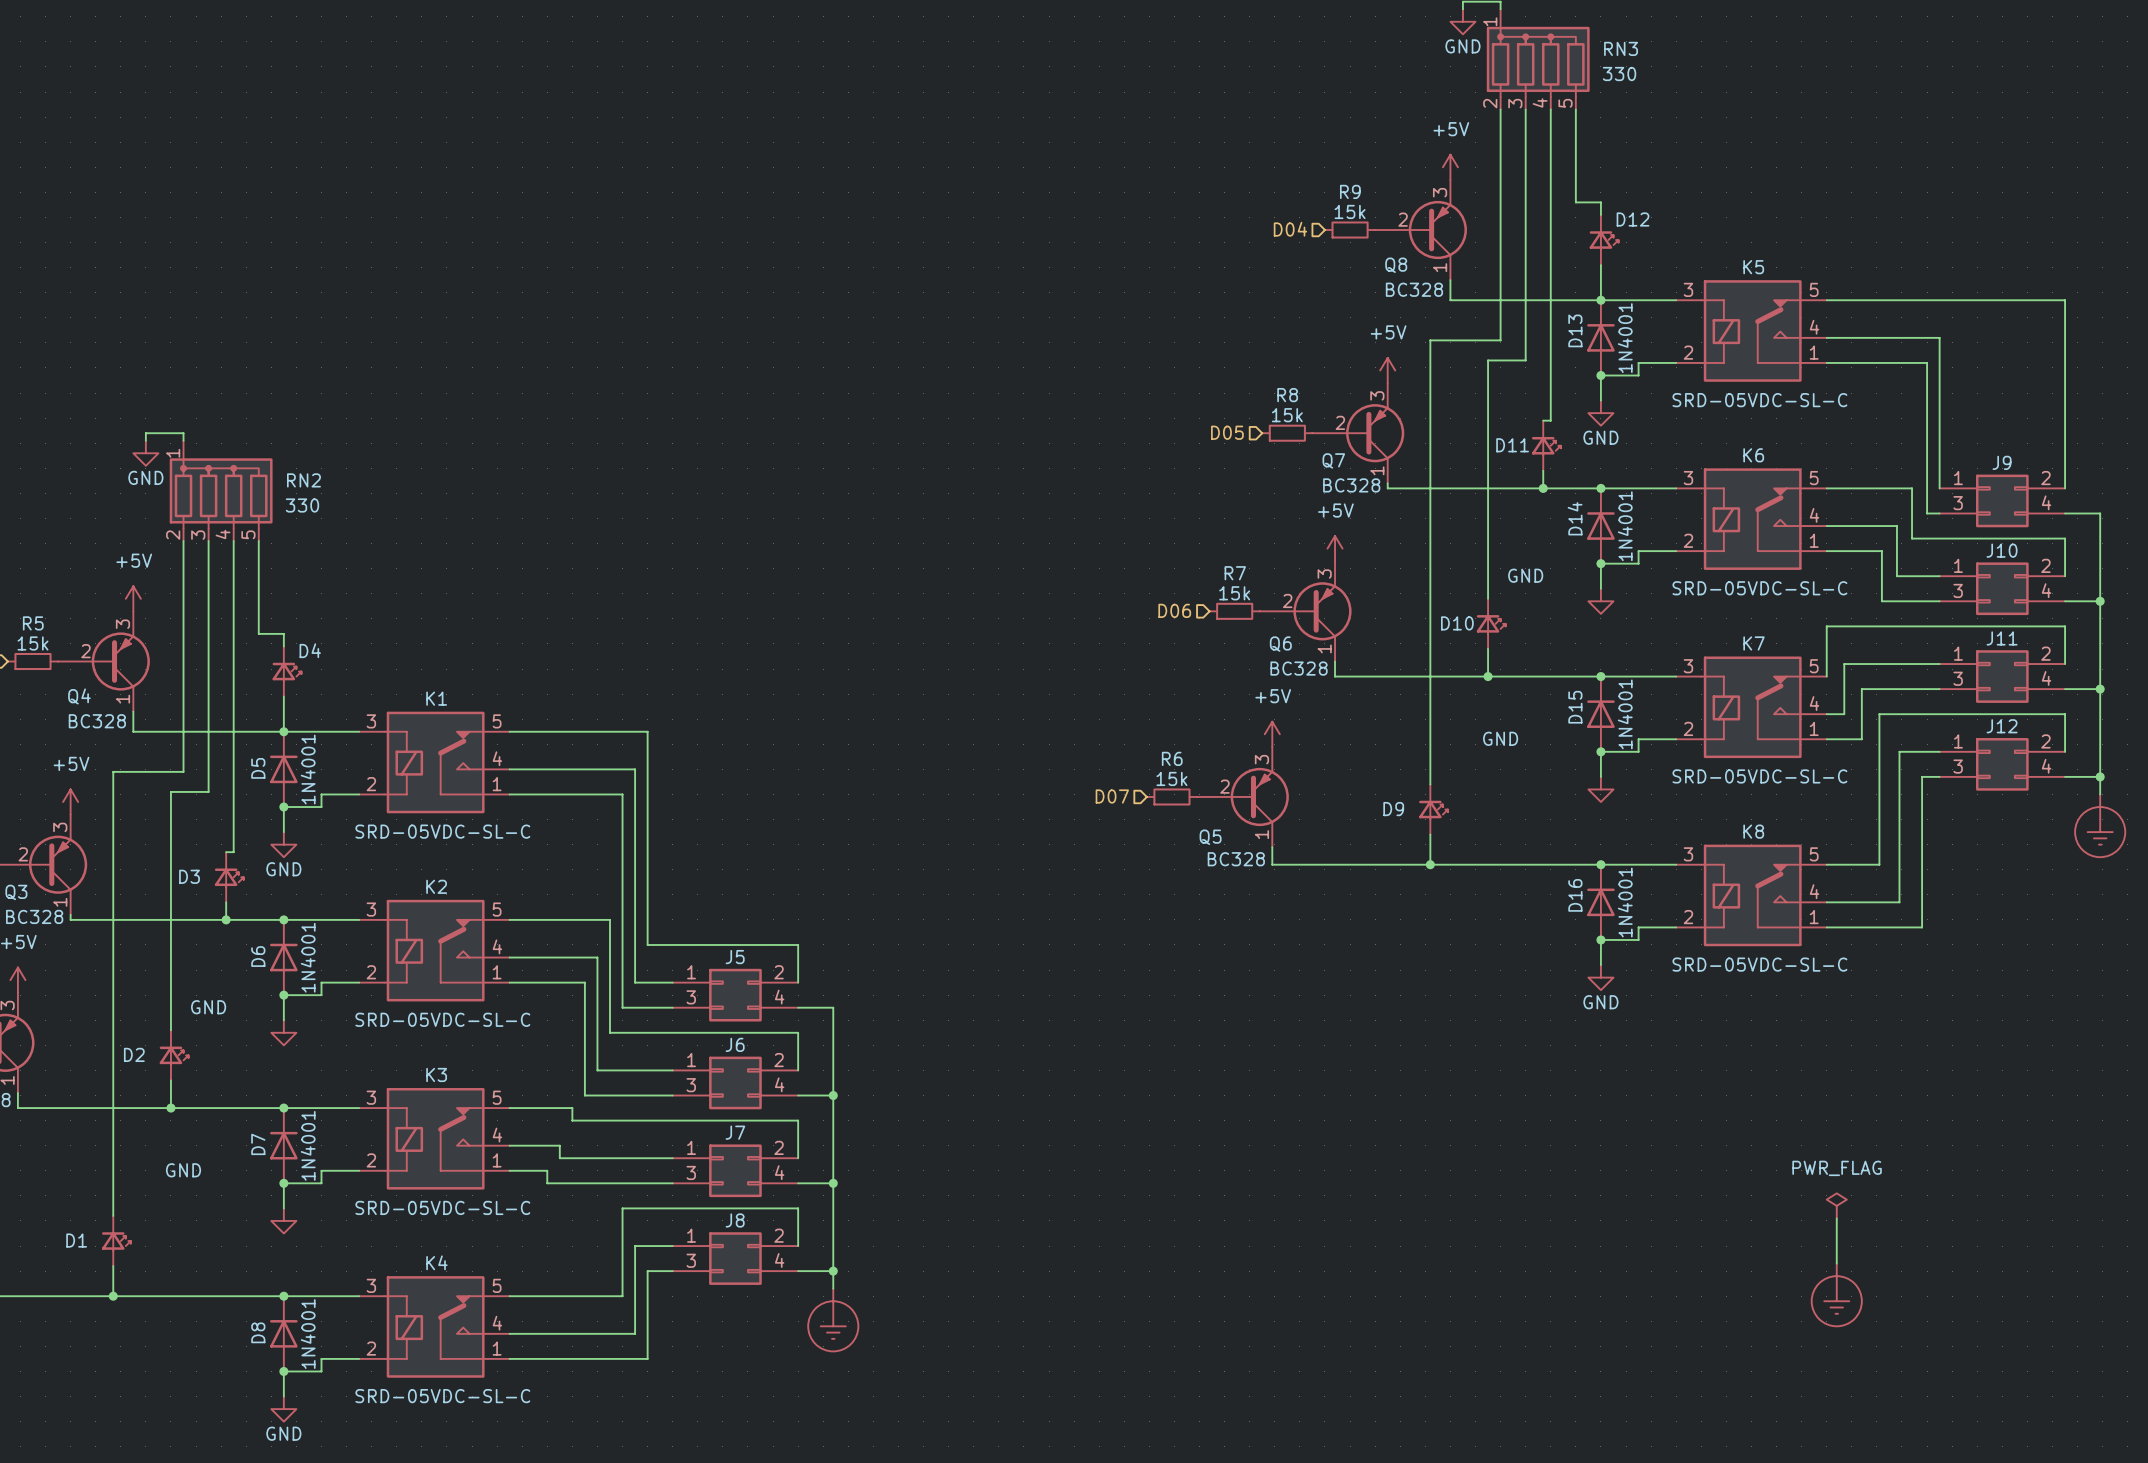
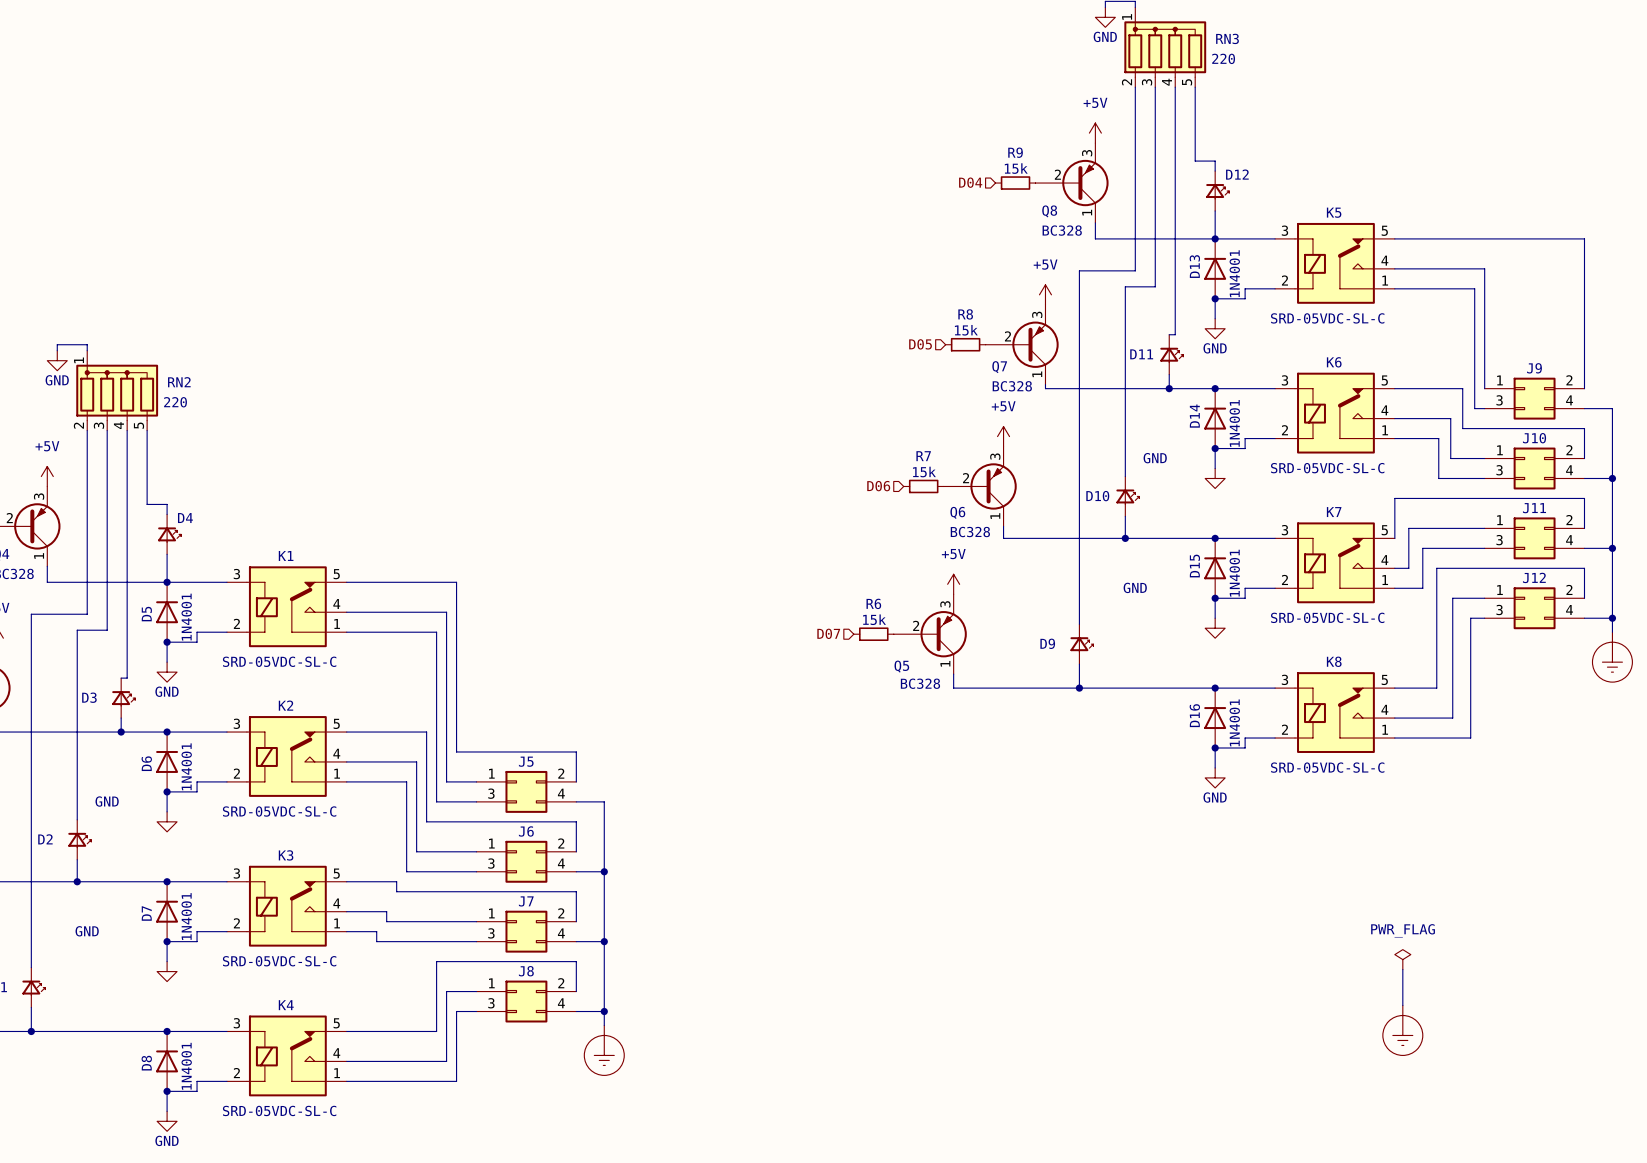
RN3 value: 330 (1619, 73) -> 220 (1223, 58)
RN2 value: 330 (302, 505) -> 220 (175, 402)

